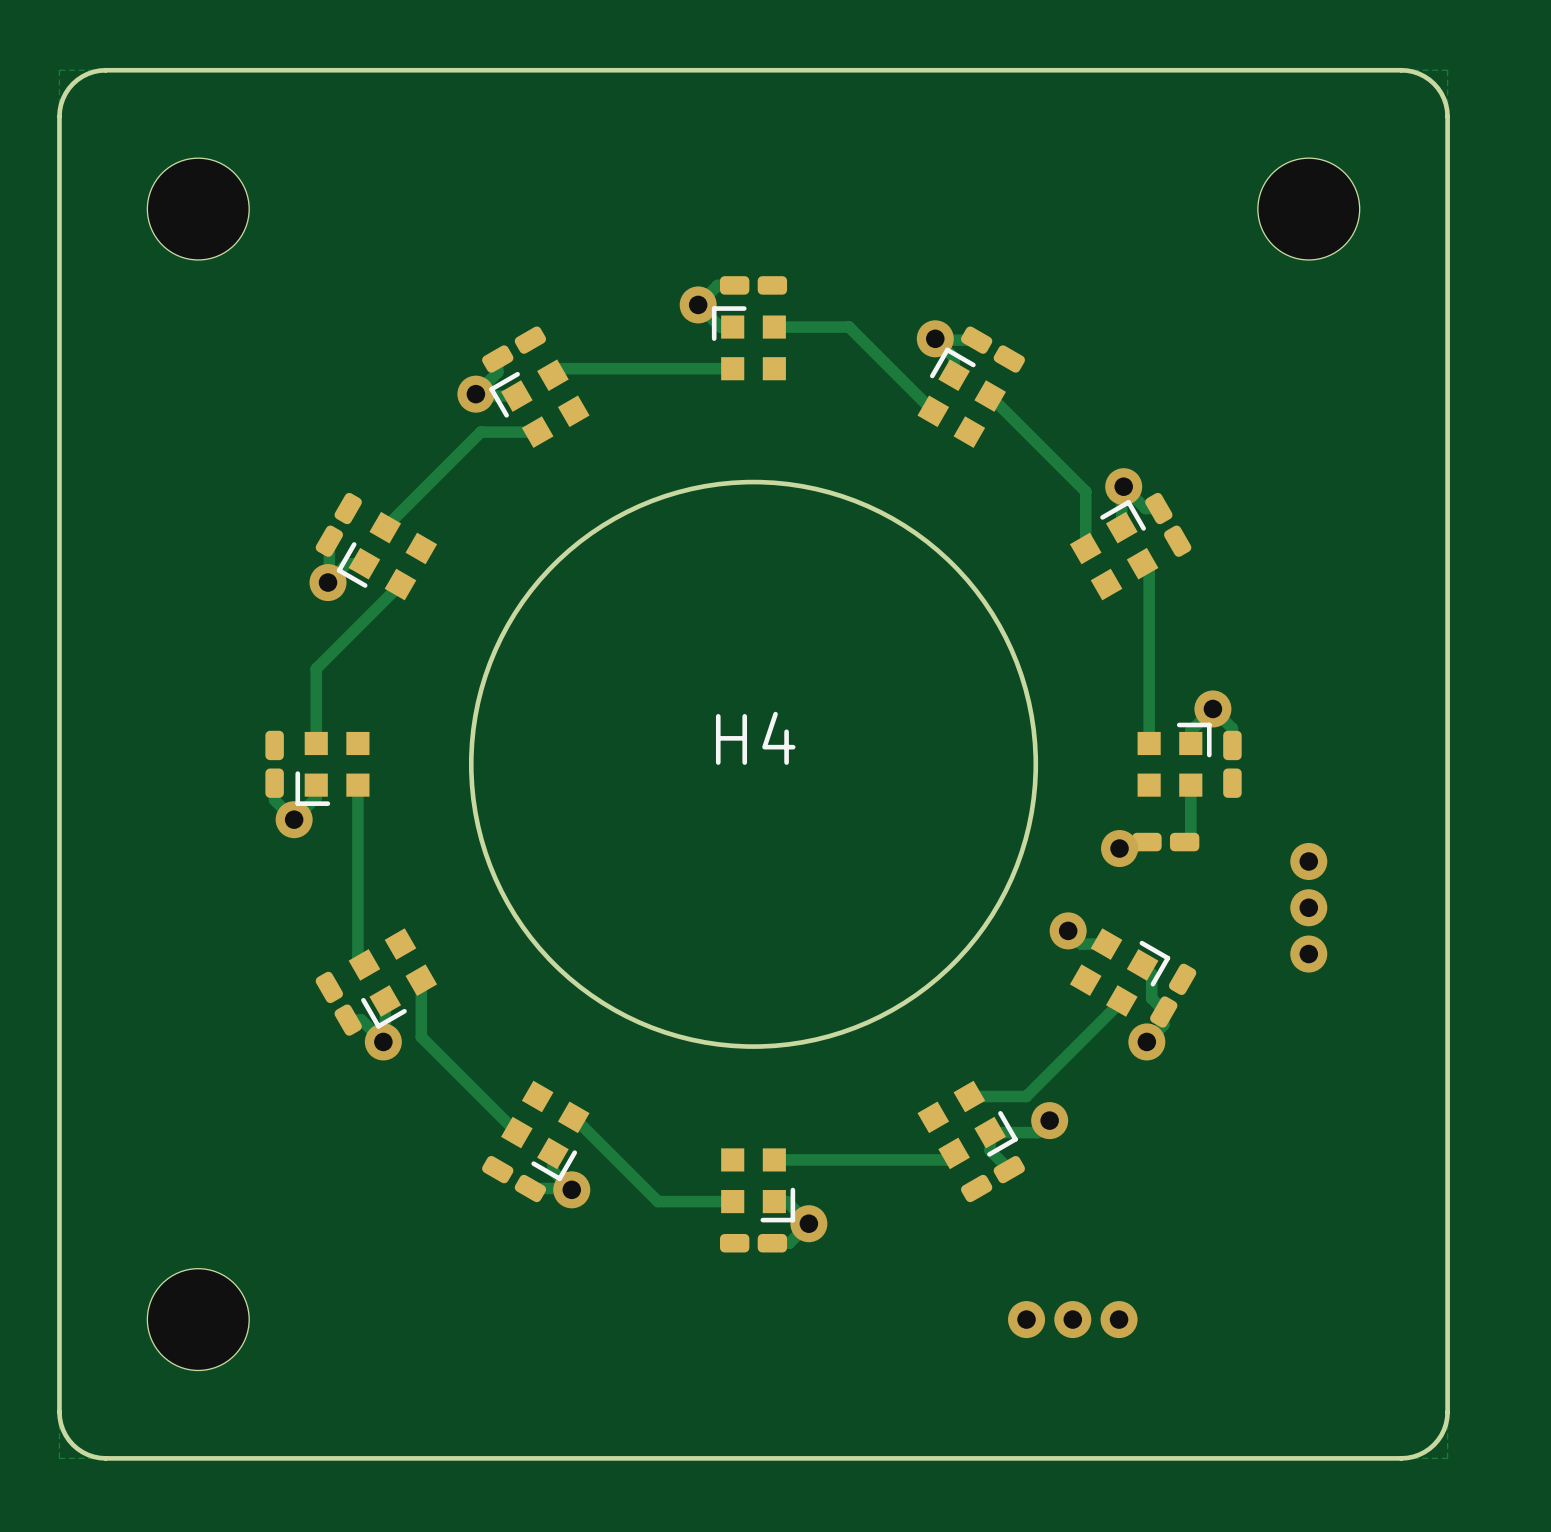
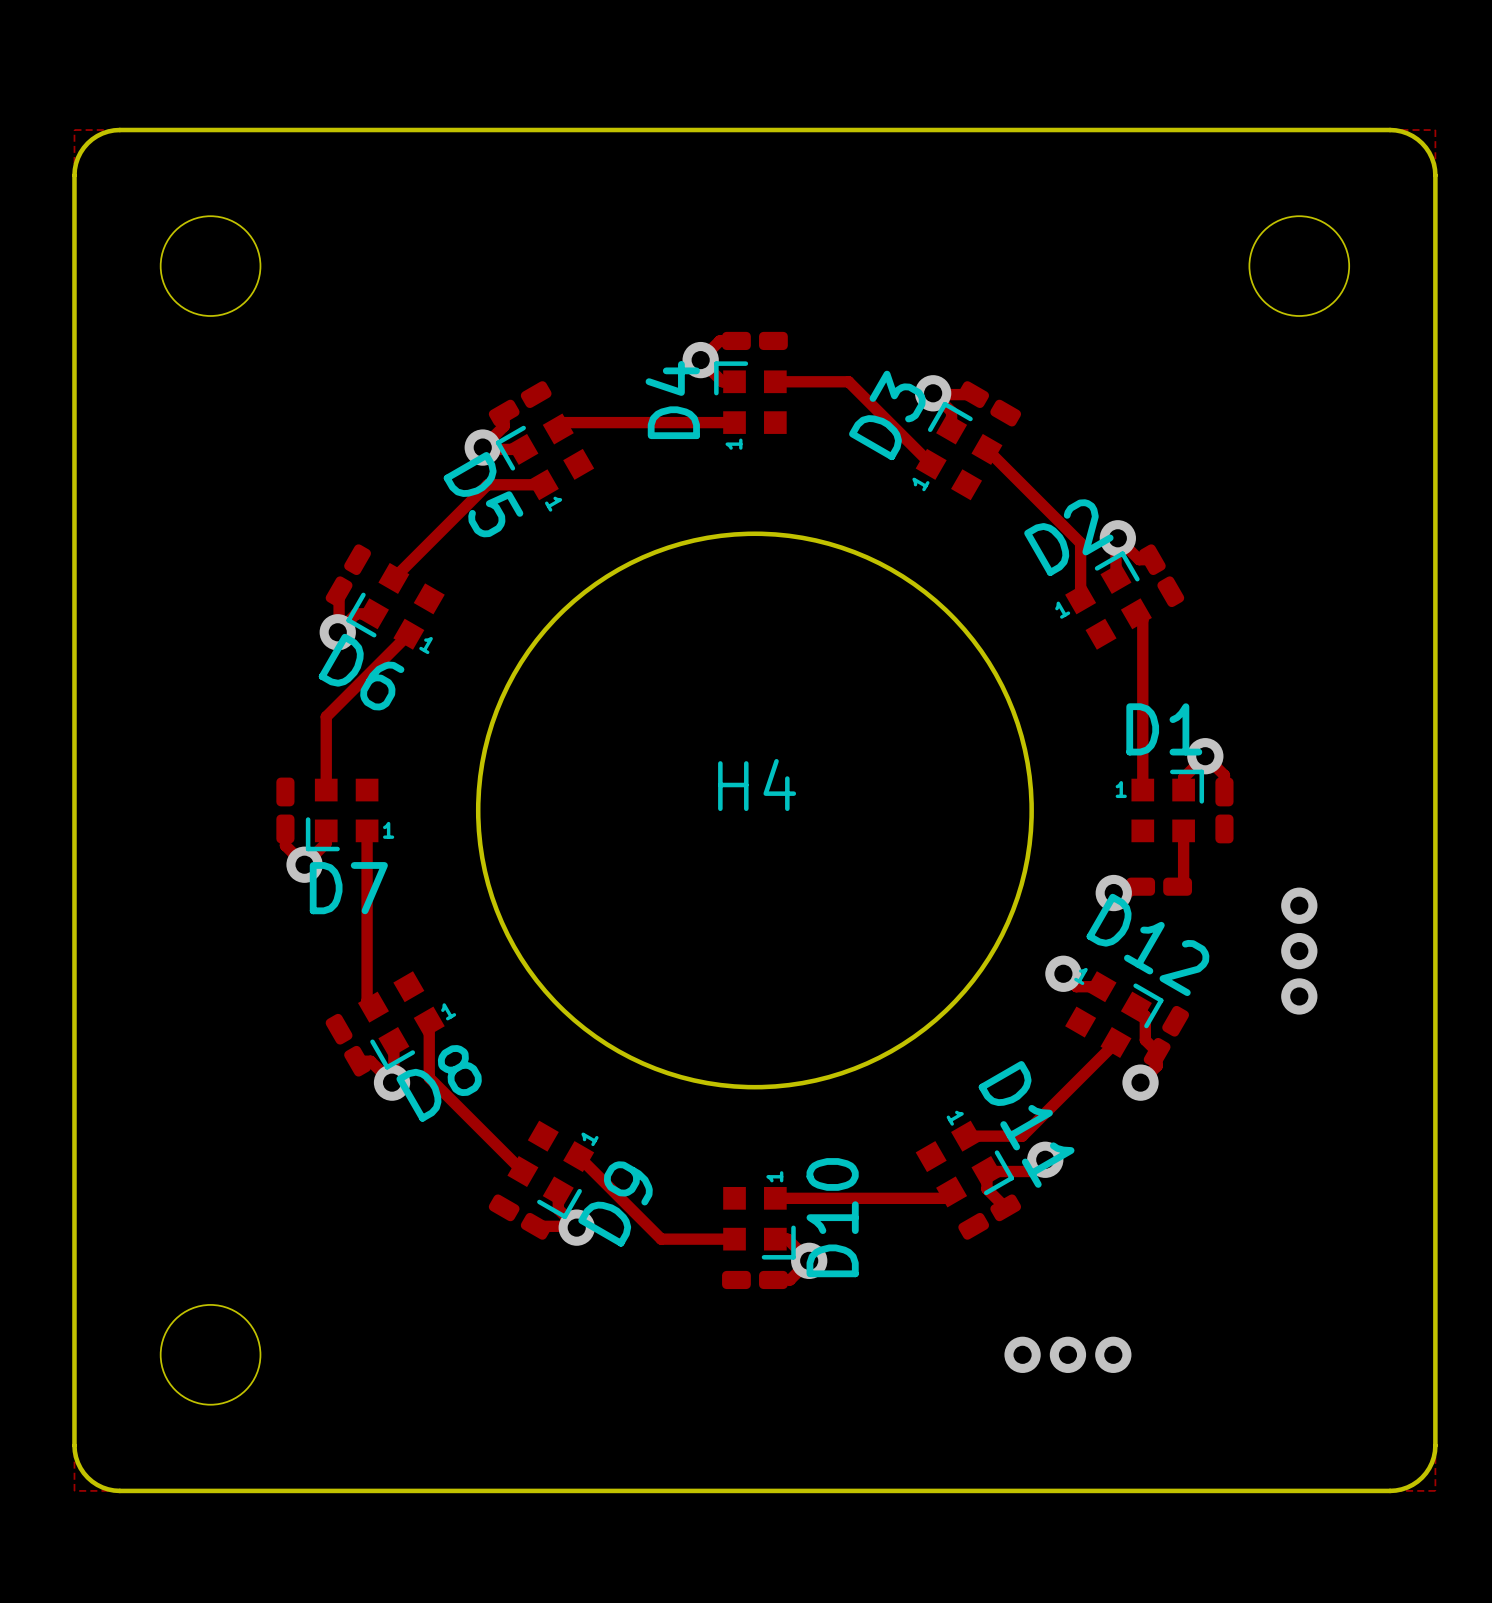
D4 name: none -> D4 (672, 400)
D3 name: none -> D3 (887, 415)
D4 text: none -> 1 (734, 444)
D3 text: none -> 1 (920, 484)
D5 name: none -> D5 (483, 494)
D5 text: none -> 1 (553, 504)
D2 name: none -> D2 (1068, 537)
D2 text: none -> 1 (1062, 610)
D6 text: none -> 1 (426, 645)
D6 name: none -> D6 (361, 672)
D1 name: none -> D1 (1164, 729)
D1 text: none -> 1 (1121, 789)
D7 text: none -> 1 (388, 830)
D7 name: none -> D7 (348, 888)
D12 name: none -> D12 (1147, 944)
D12 text: none -> 1 (1080, 976)
D8 text: none -> 1 (448, 1011)
D8 name: none -> D8 (439, 1083)
D11 text: none -> 1 (955, 1118)
D11 name: none -> D11 (1026, 1124)
D9 text: none -> 1 (589, 1139)
D10 text: none -> 1 (774, 1176)
D9 name: none -> D9 (615, 1203)
D10 name: none -> D10 (832, 1217)

